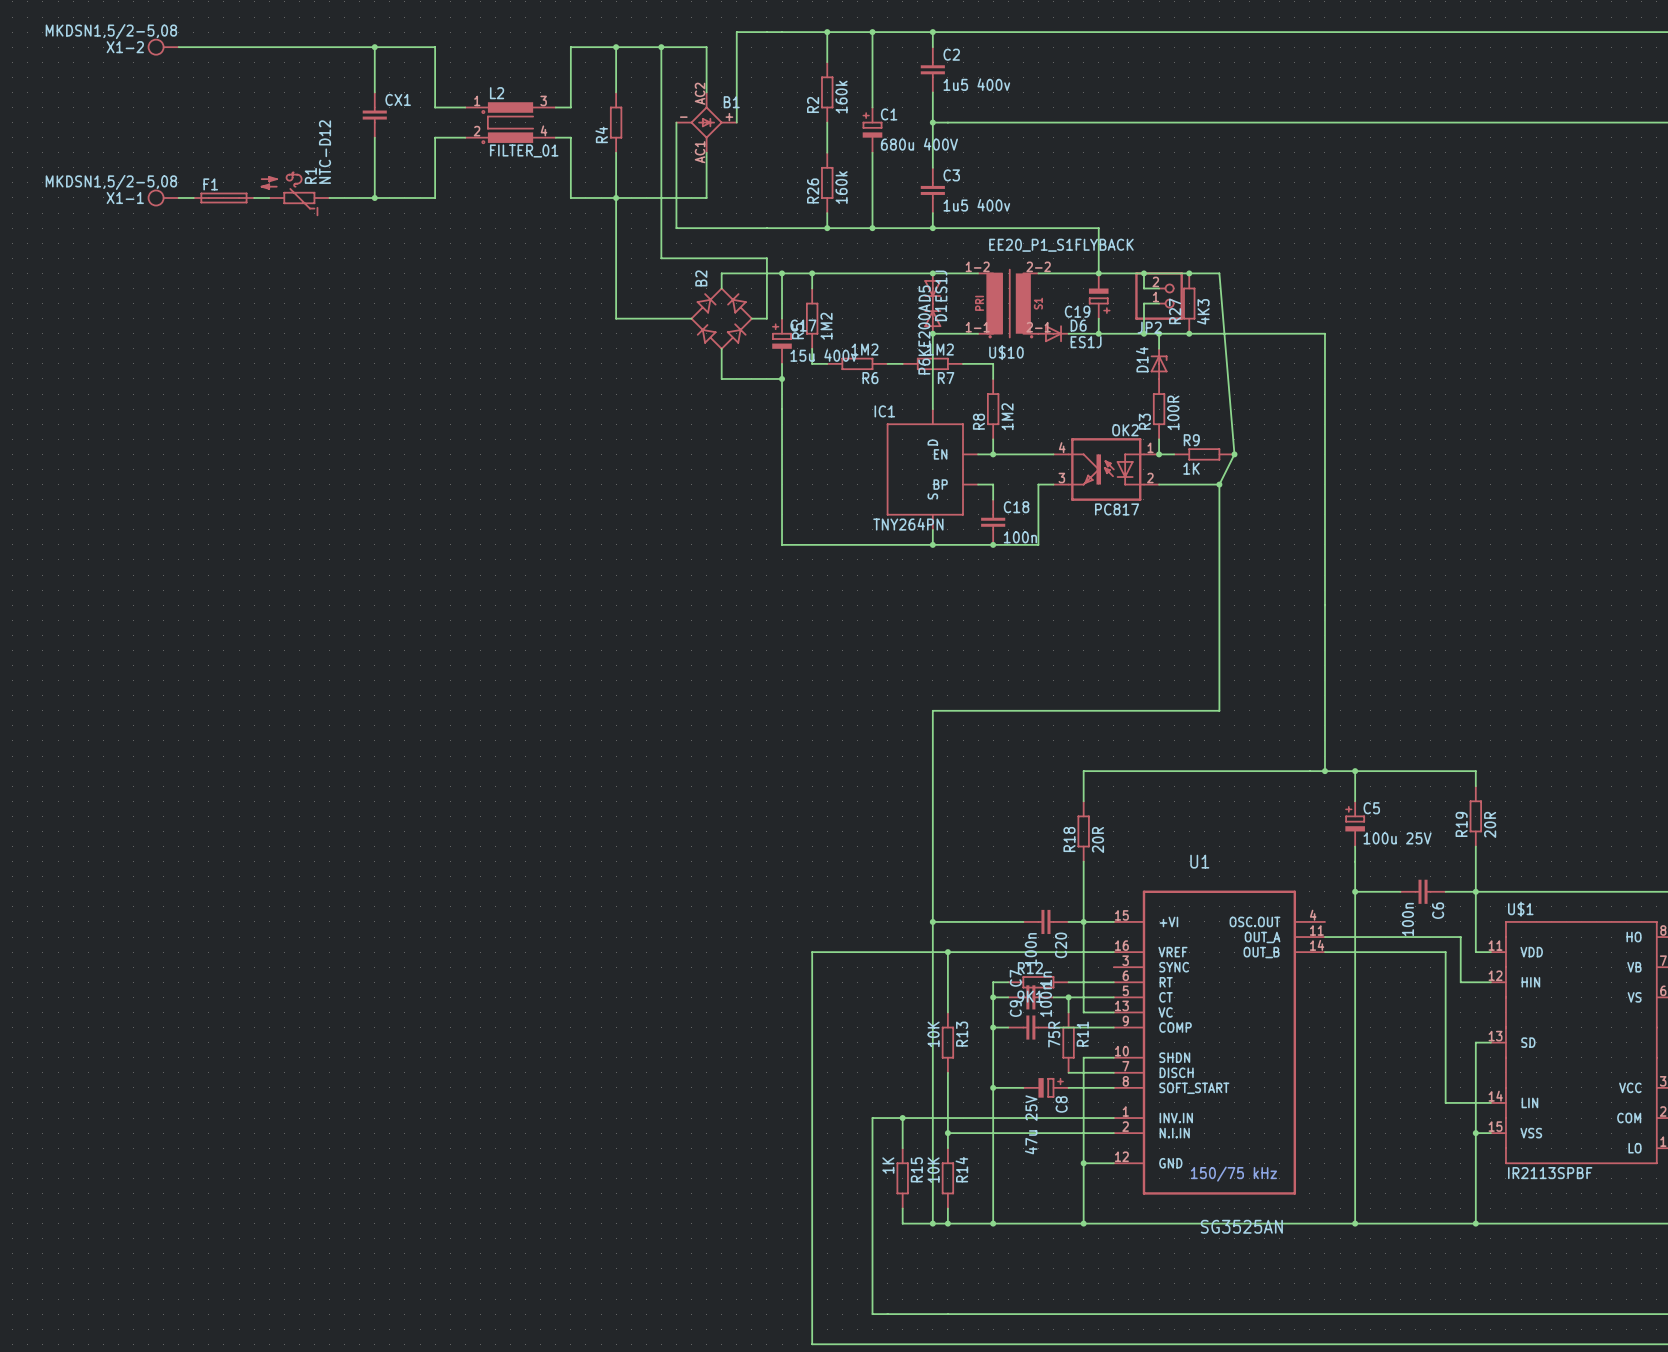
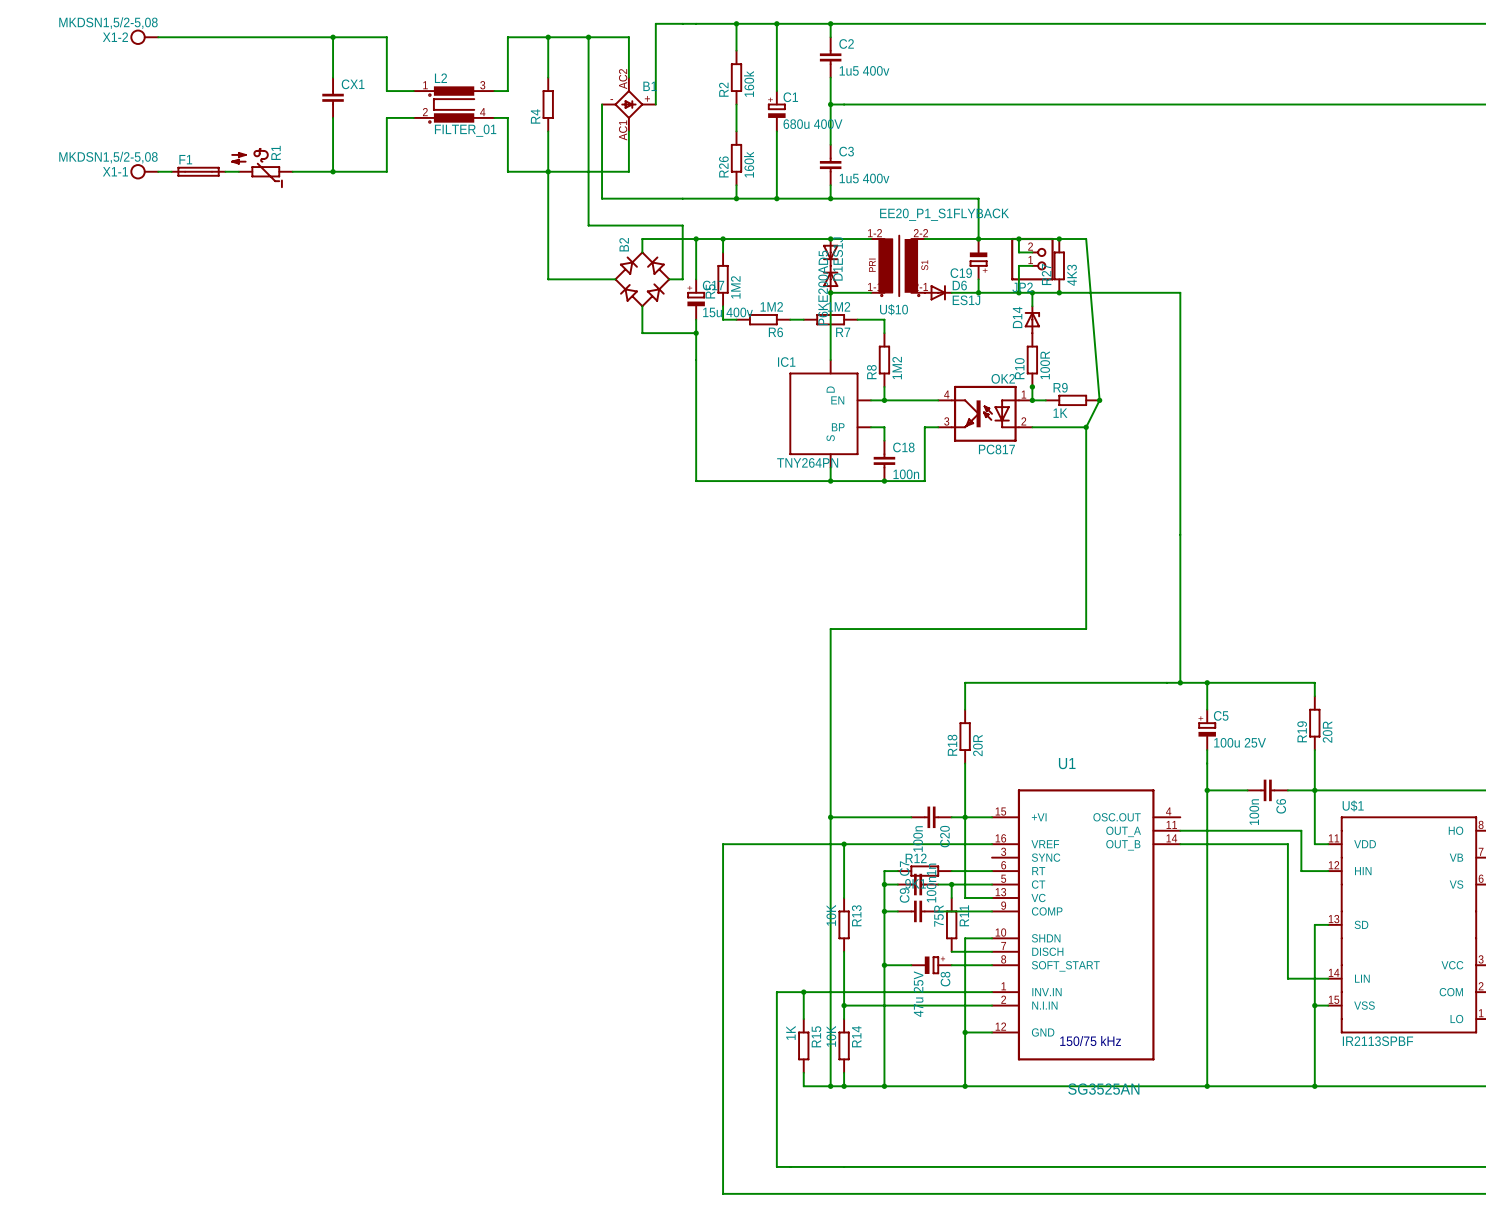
R1 value: NTC-D12 (325, 152) -> none
R3 name: R3 (1144, 421) -> R10 (1019, 368)
junction: none -> (1032, 386)

